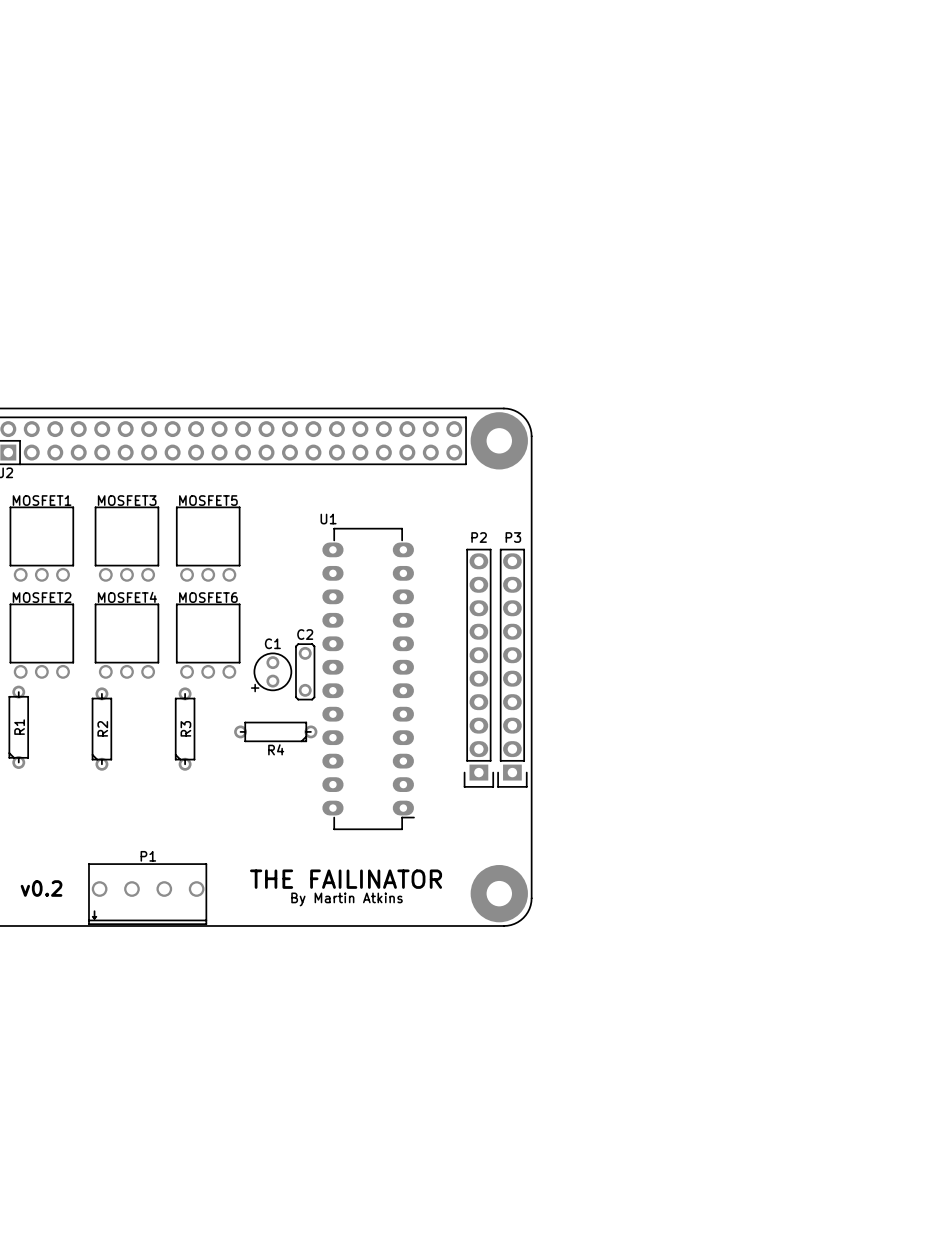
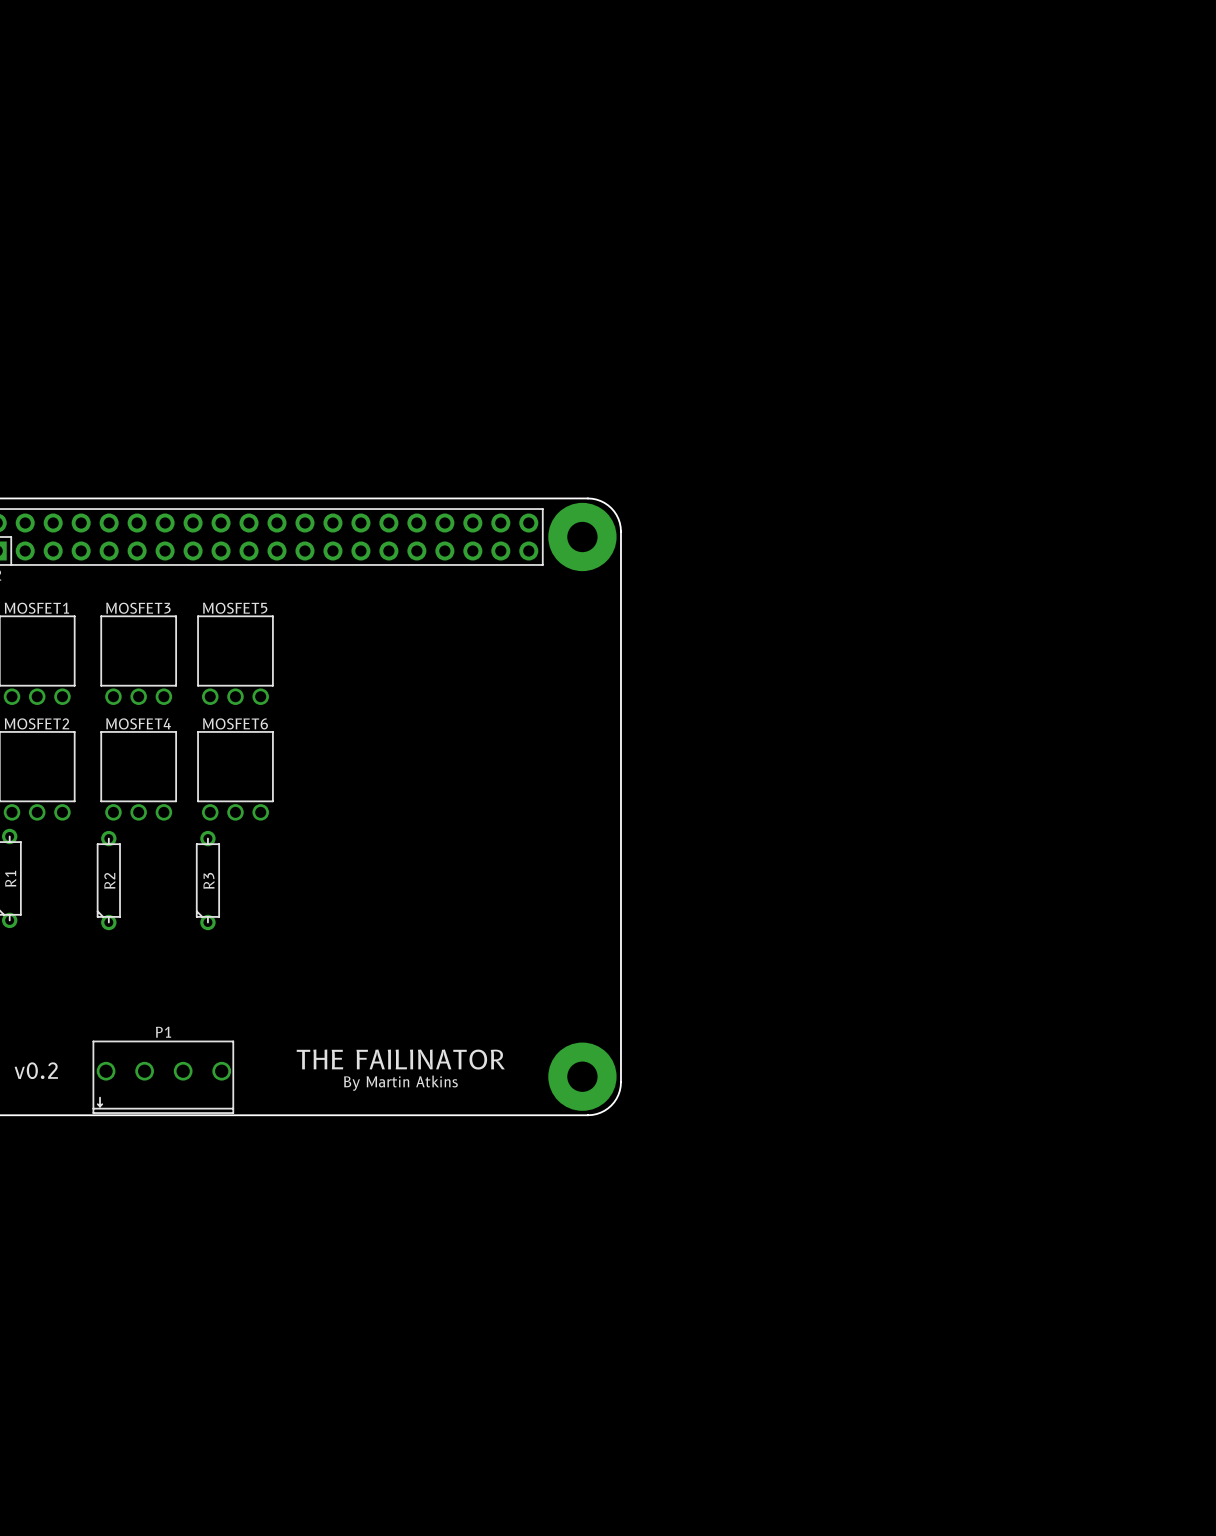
P2: (478, 668) -> none
P3: (512, 668) -> none
C1: (272, 671) -> none
C2: (305, 671) -> none
U1: (368, 678) -> none
R4: (275, 731) -> none

